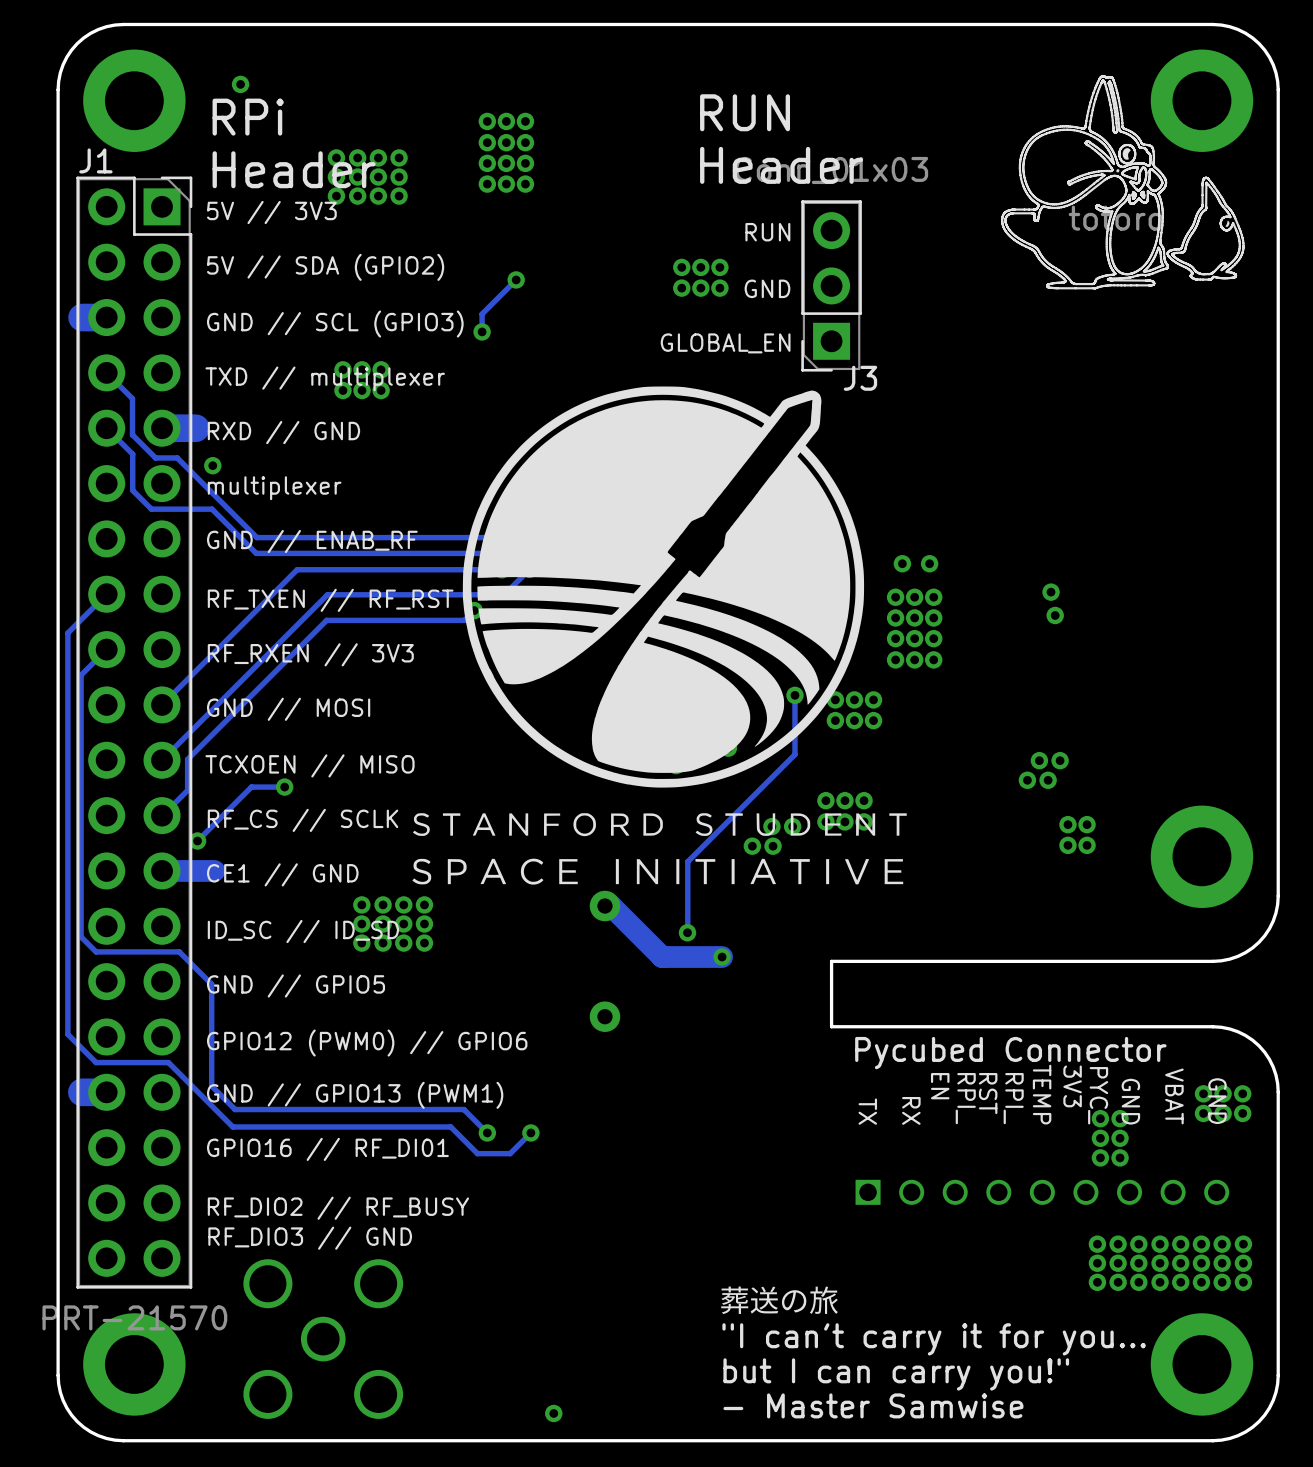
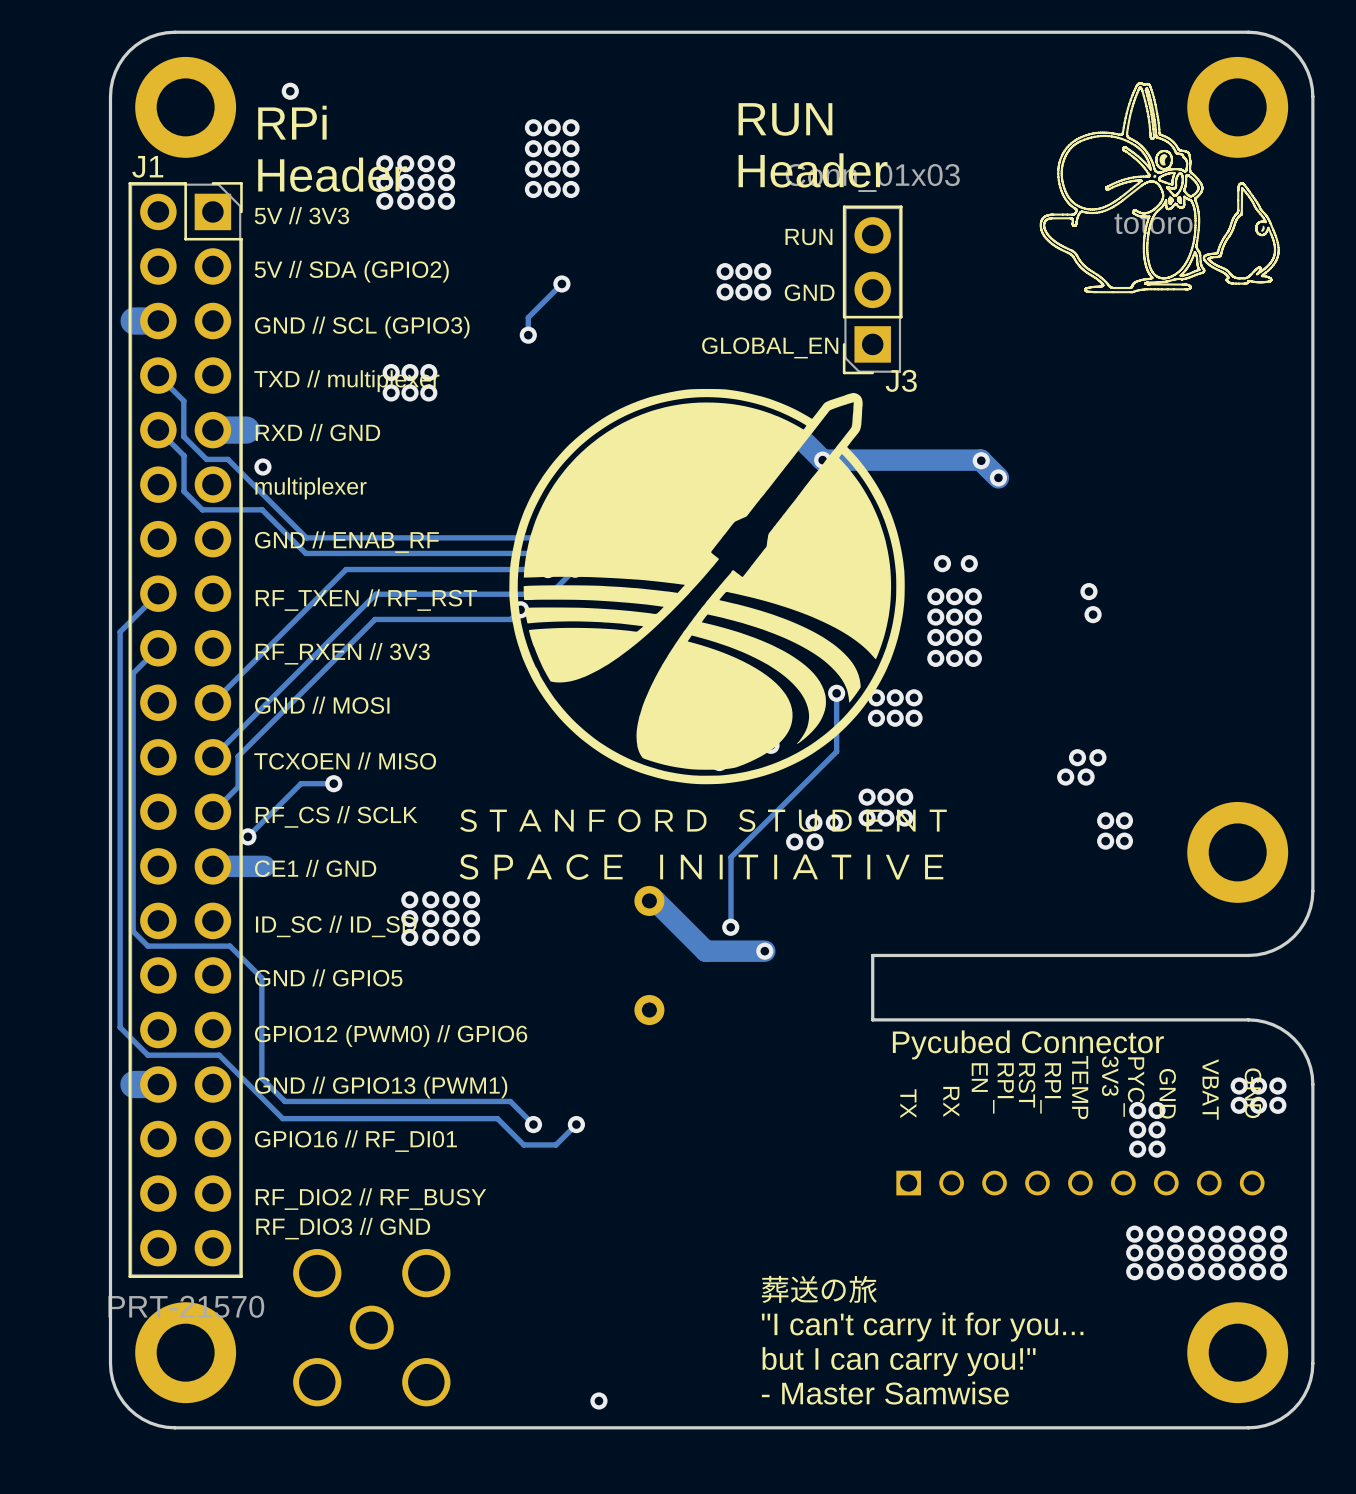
track: none -> (805, 442) (822, 460) (980, 460) (998, 477)
via: none -> (822, 460)
via: none -> (981, 460)
via: none -> (998, 477)

